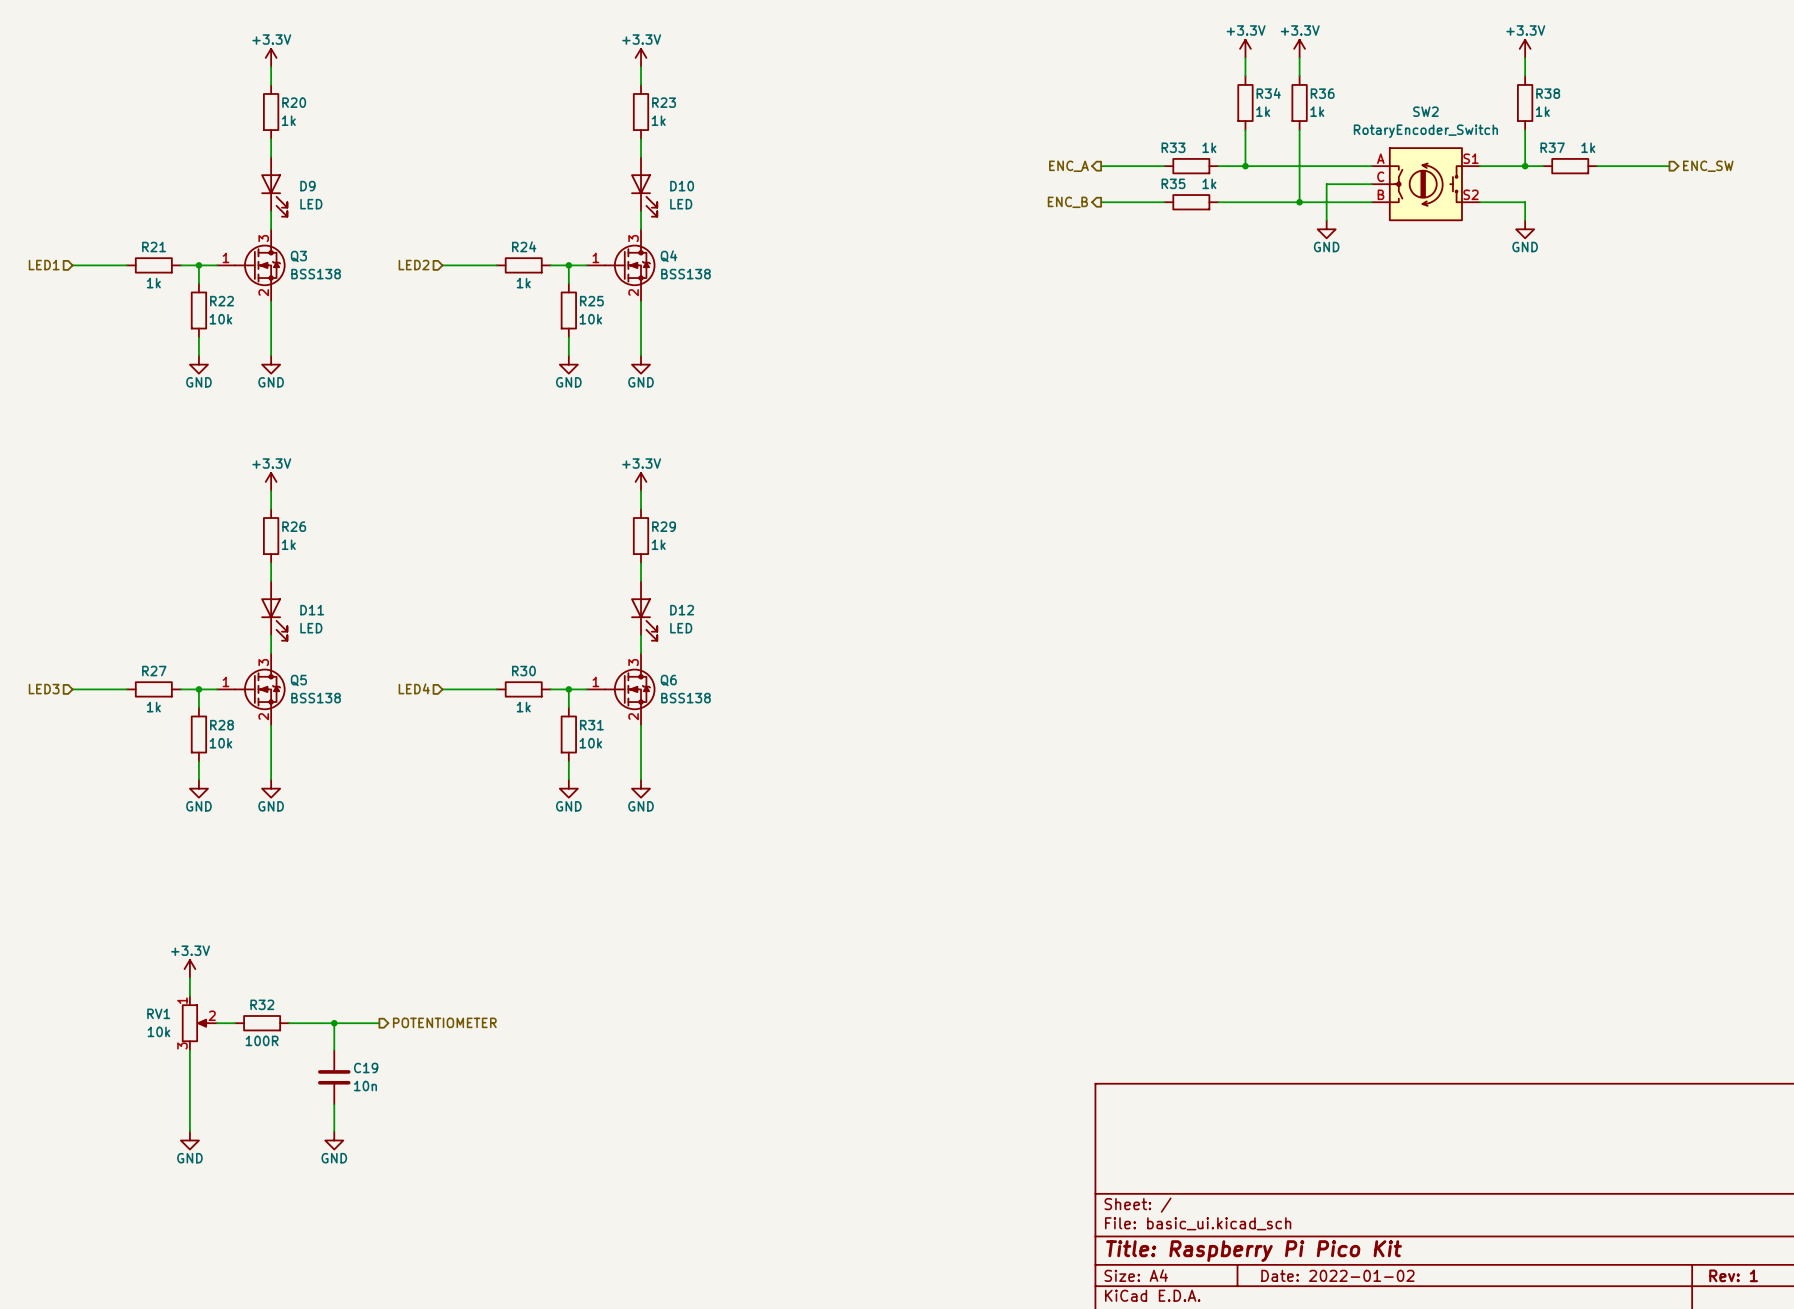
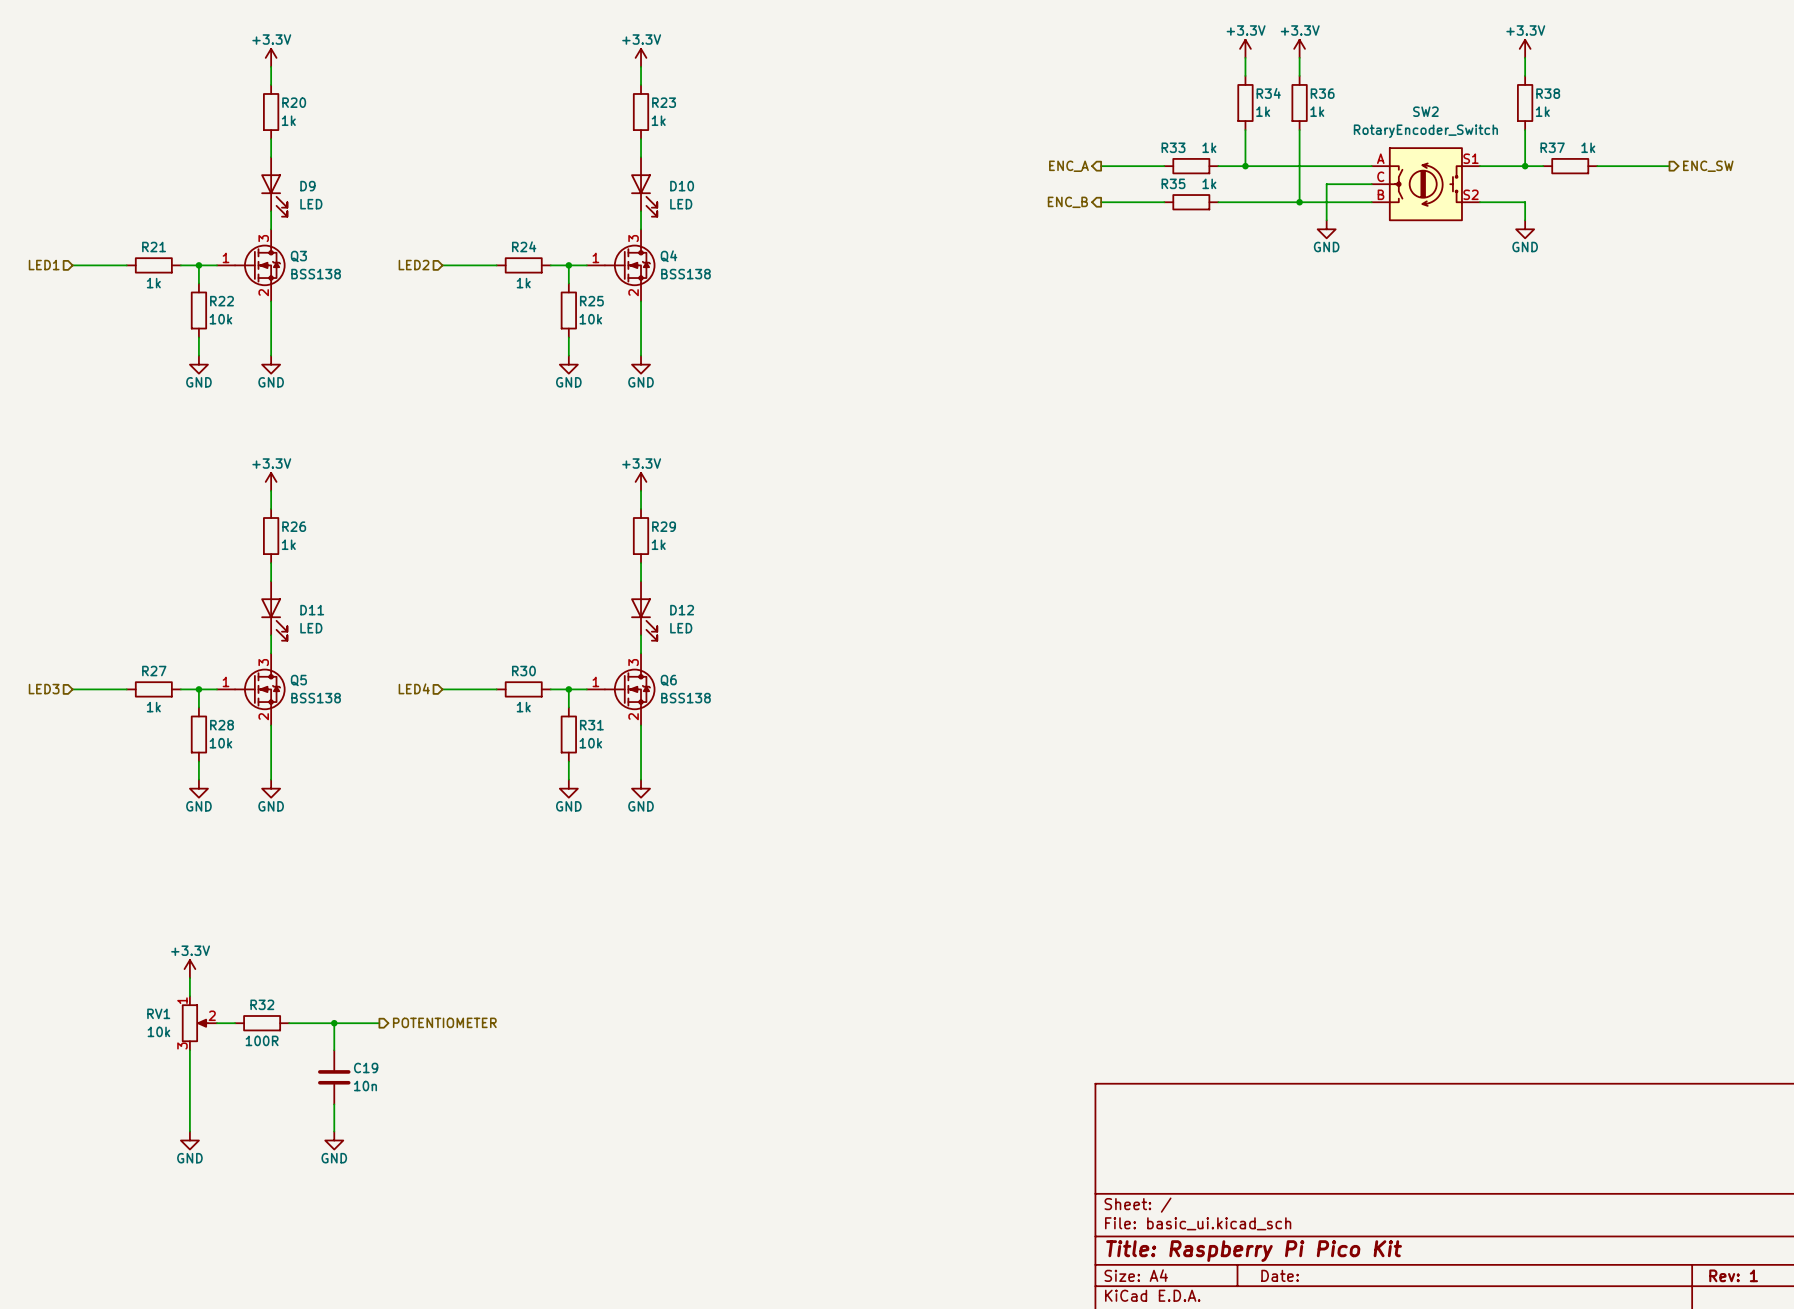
title block: Date: 2022-01-02 (1337, 1275) -> Date: (1280, 1275)

